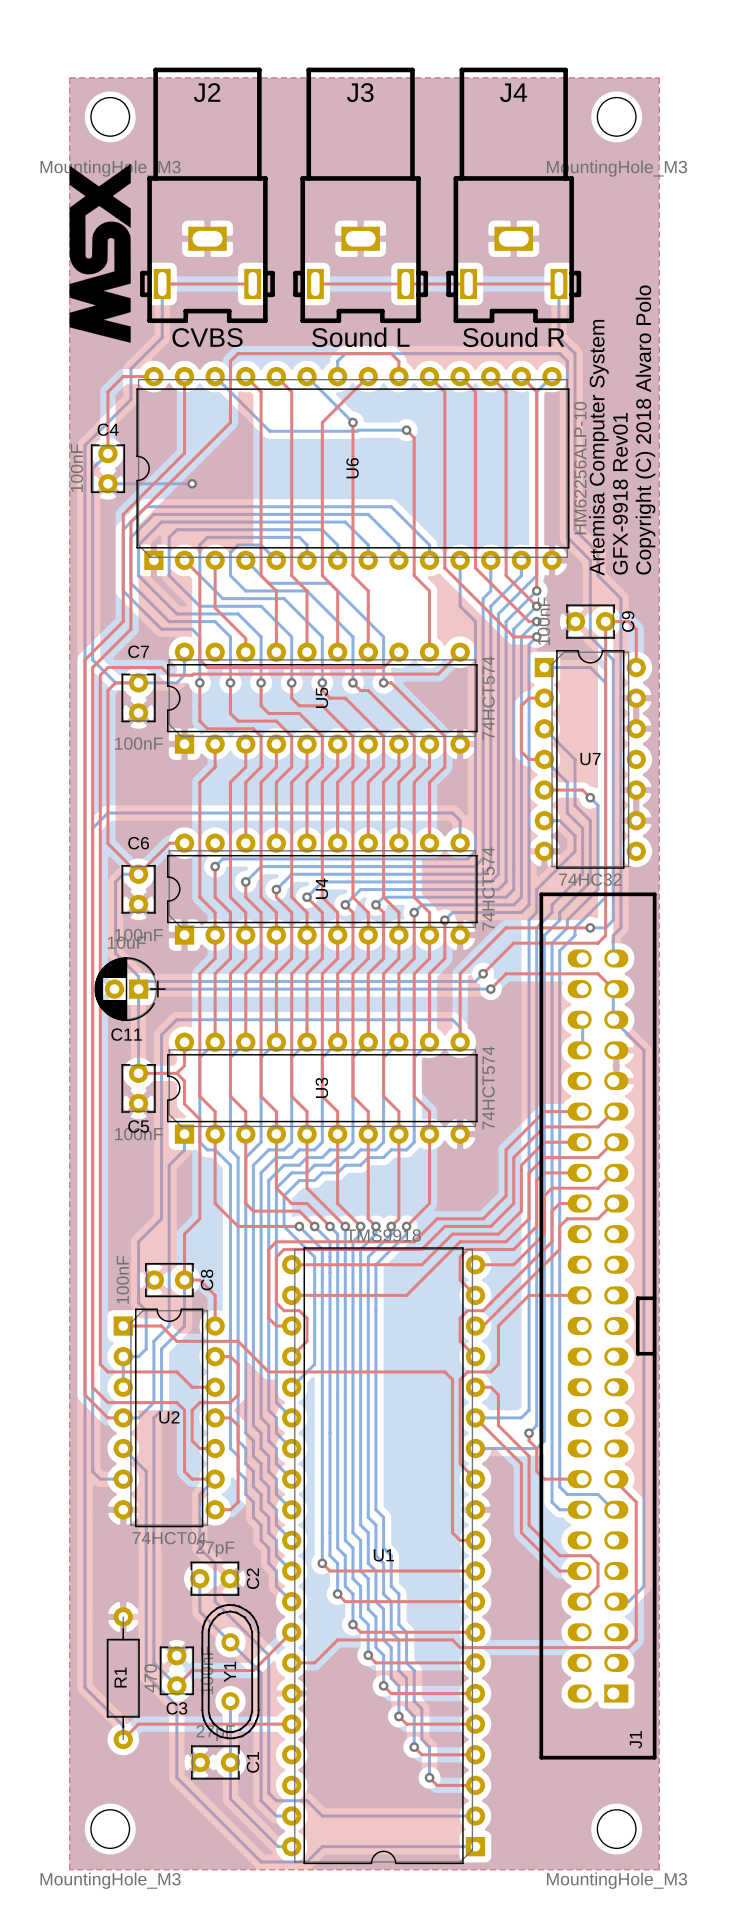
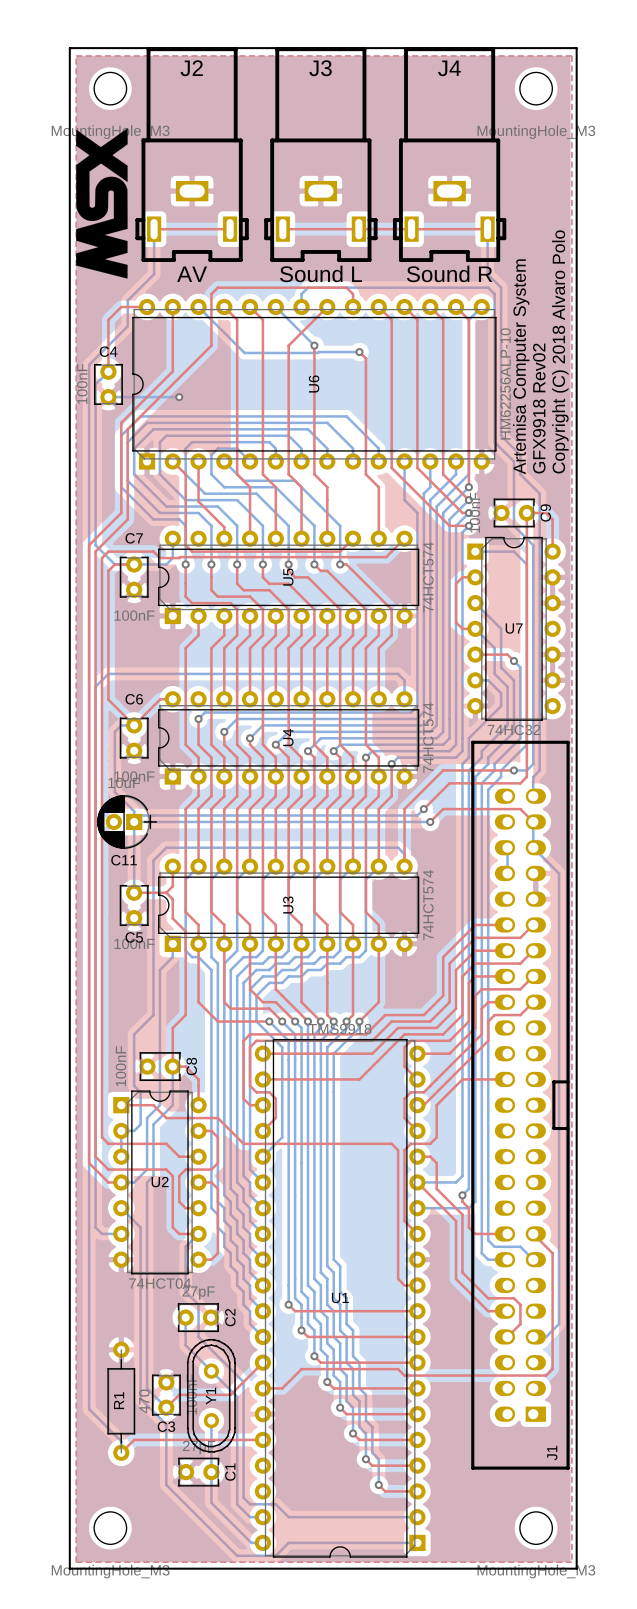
board edge: none -> (69, 48) (69, 1568) (576, 1568) (576, 48) (69, 48)
J2 value: CVBS (207, 337) -> AV (192, 274)
text: GFX-9918 Rev01 (620, 493) -> GFX9918 Rev02 (539, 408)

